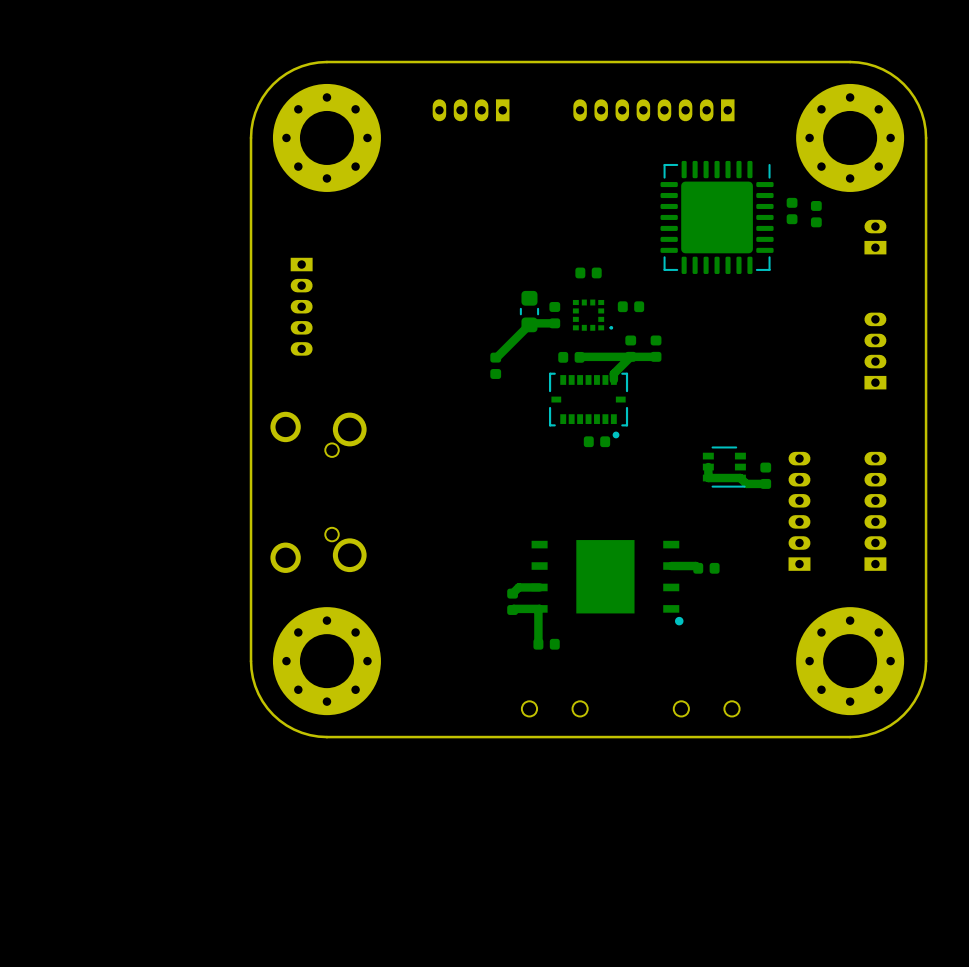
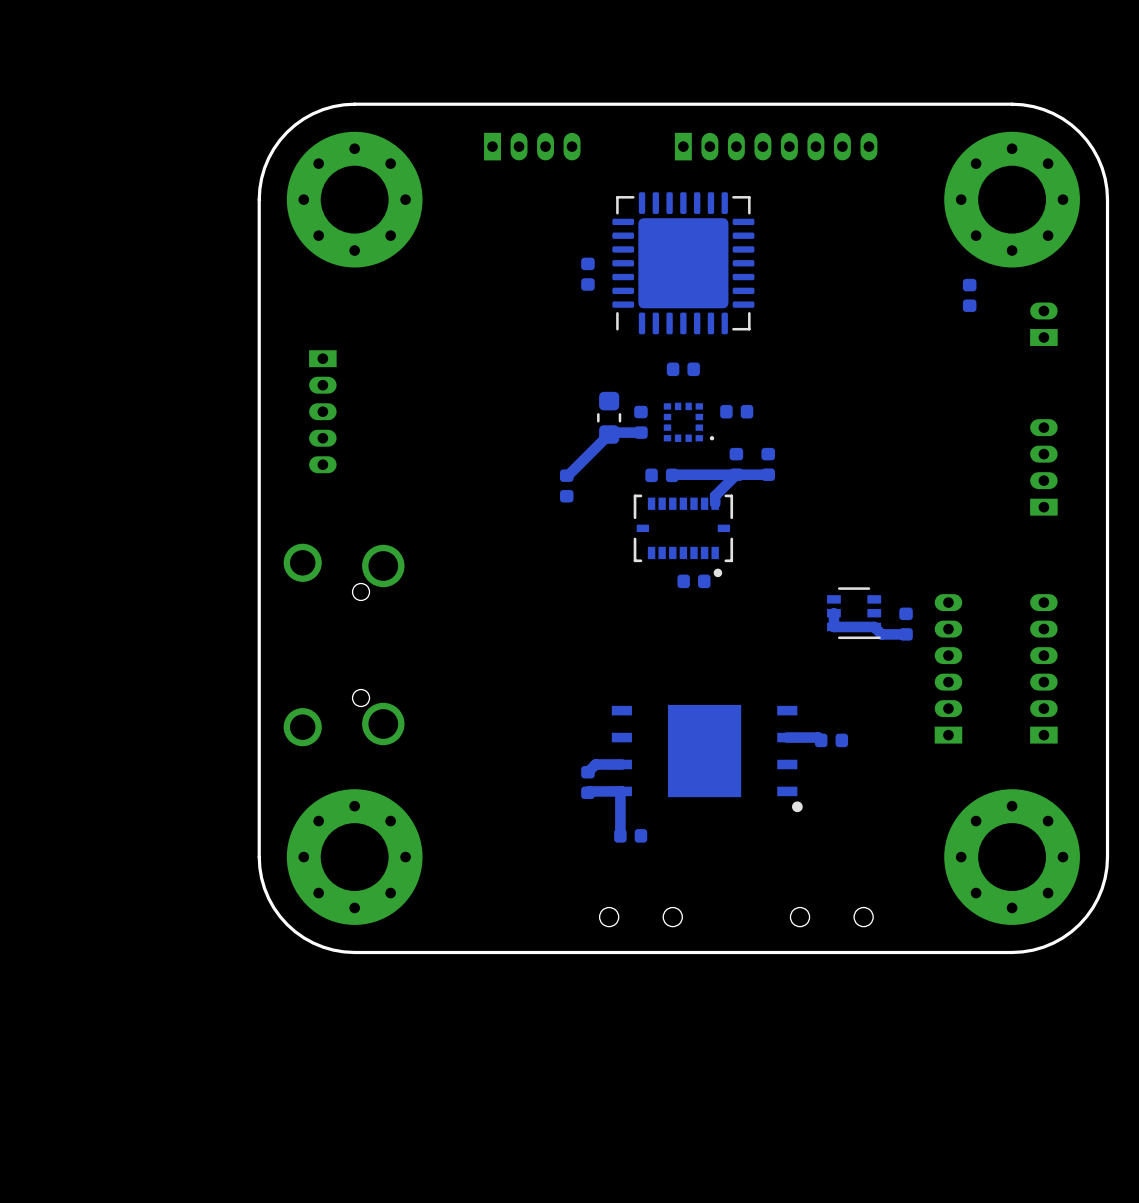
part rotation: 0° (471, 110) -> 180° (532, 146)
part rotation: 0° (653, 110) -> 180° (776, 146)
part position: (792, 211) -> (587, 274)
part rotation: 0° (717, 217) -> 180° (683, 263)
part position: (717, 217) -> (683, 263)

